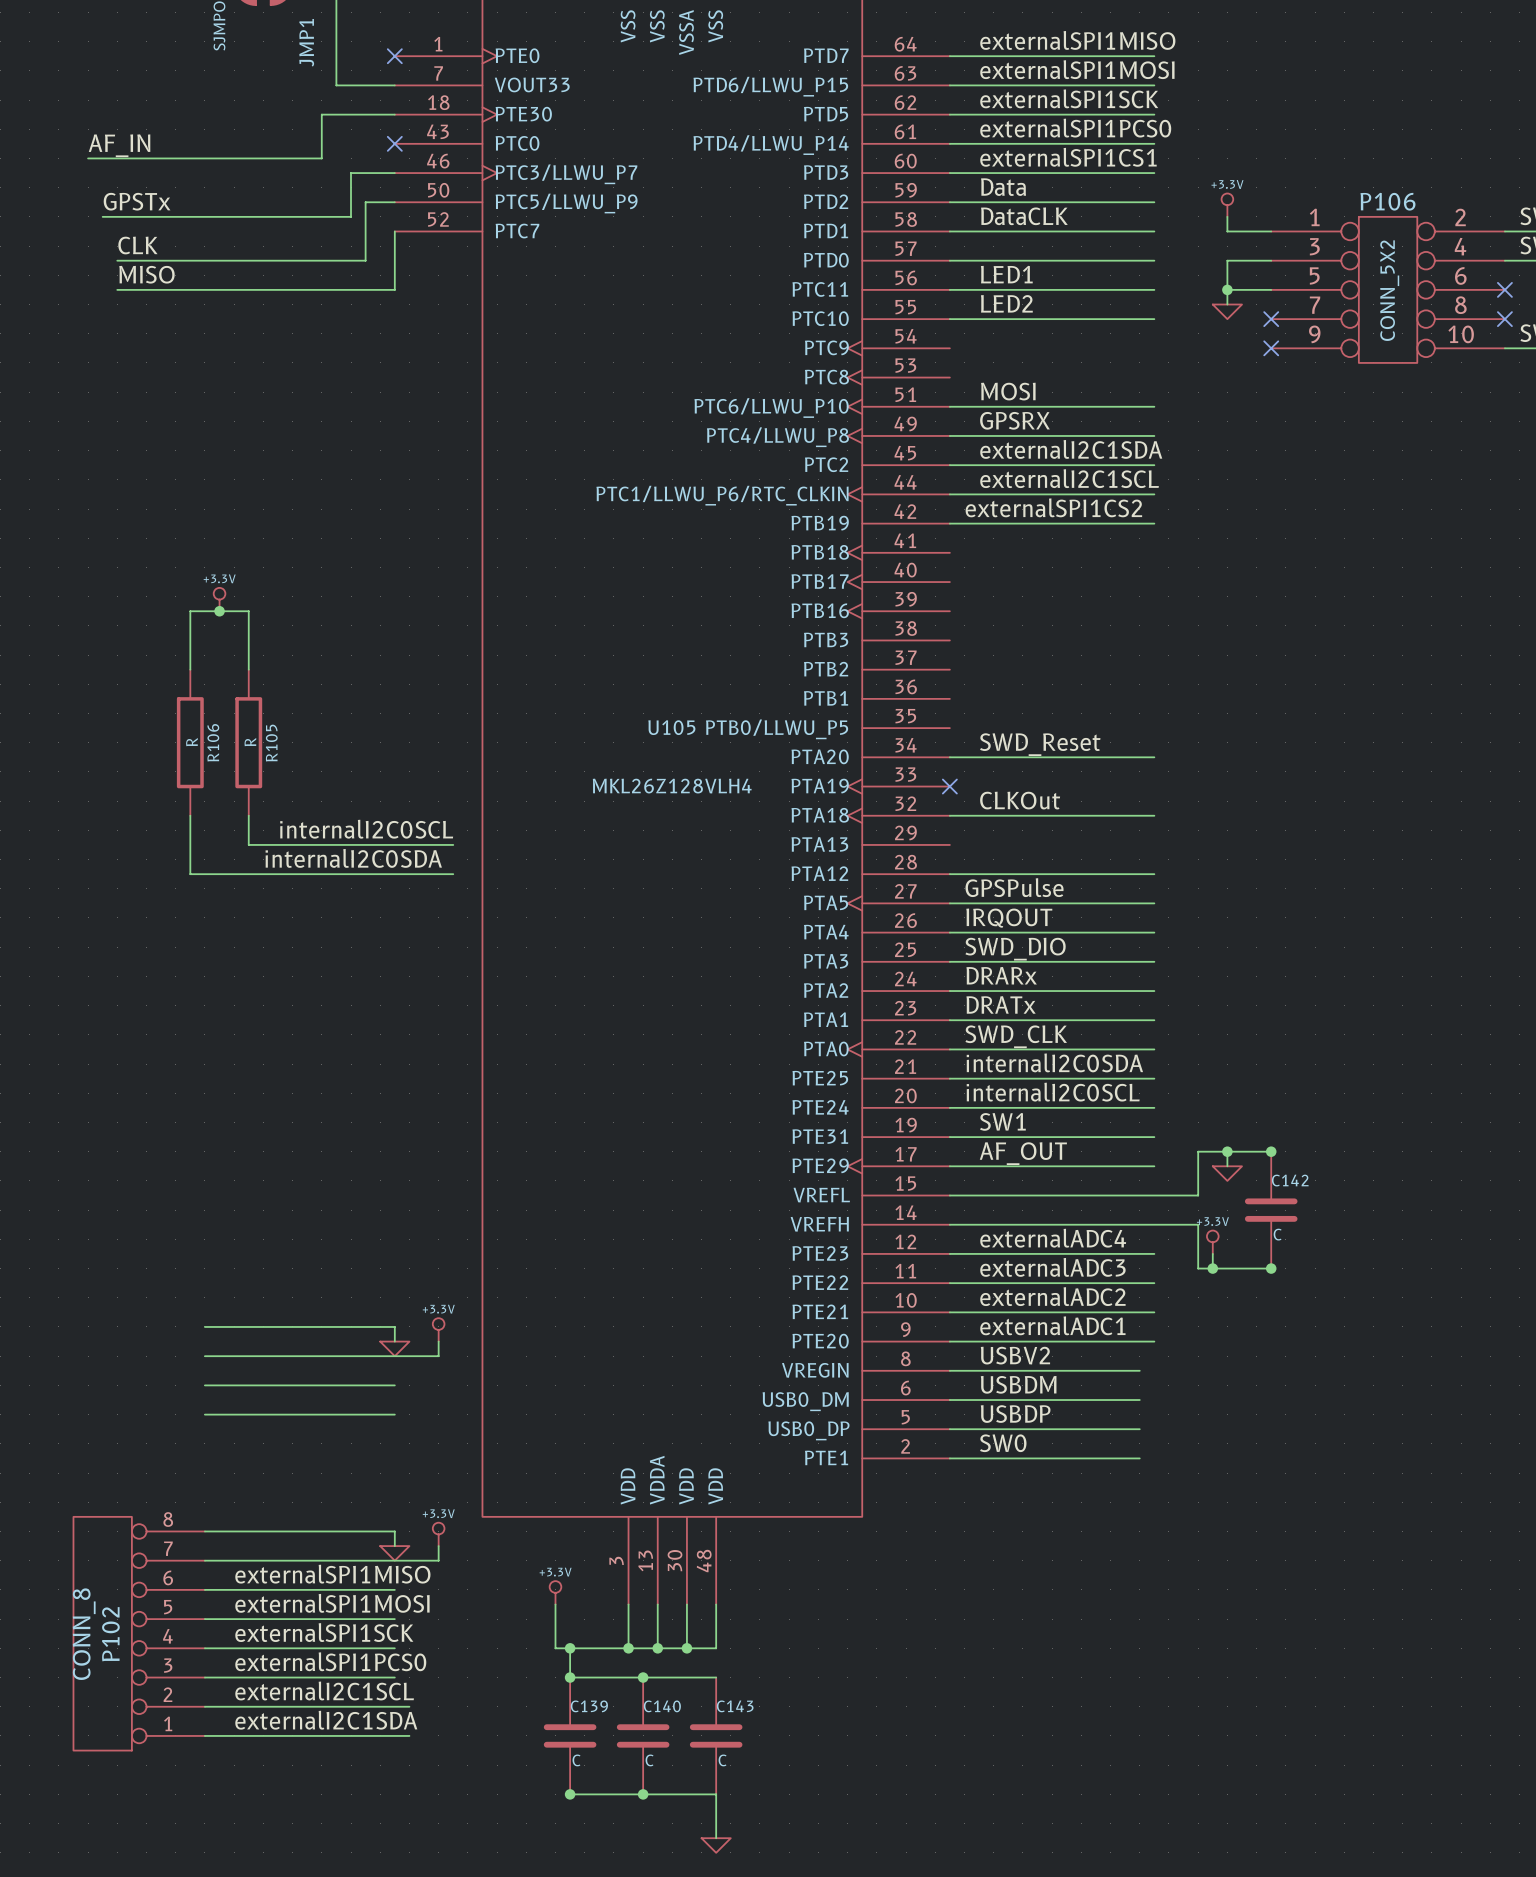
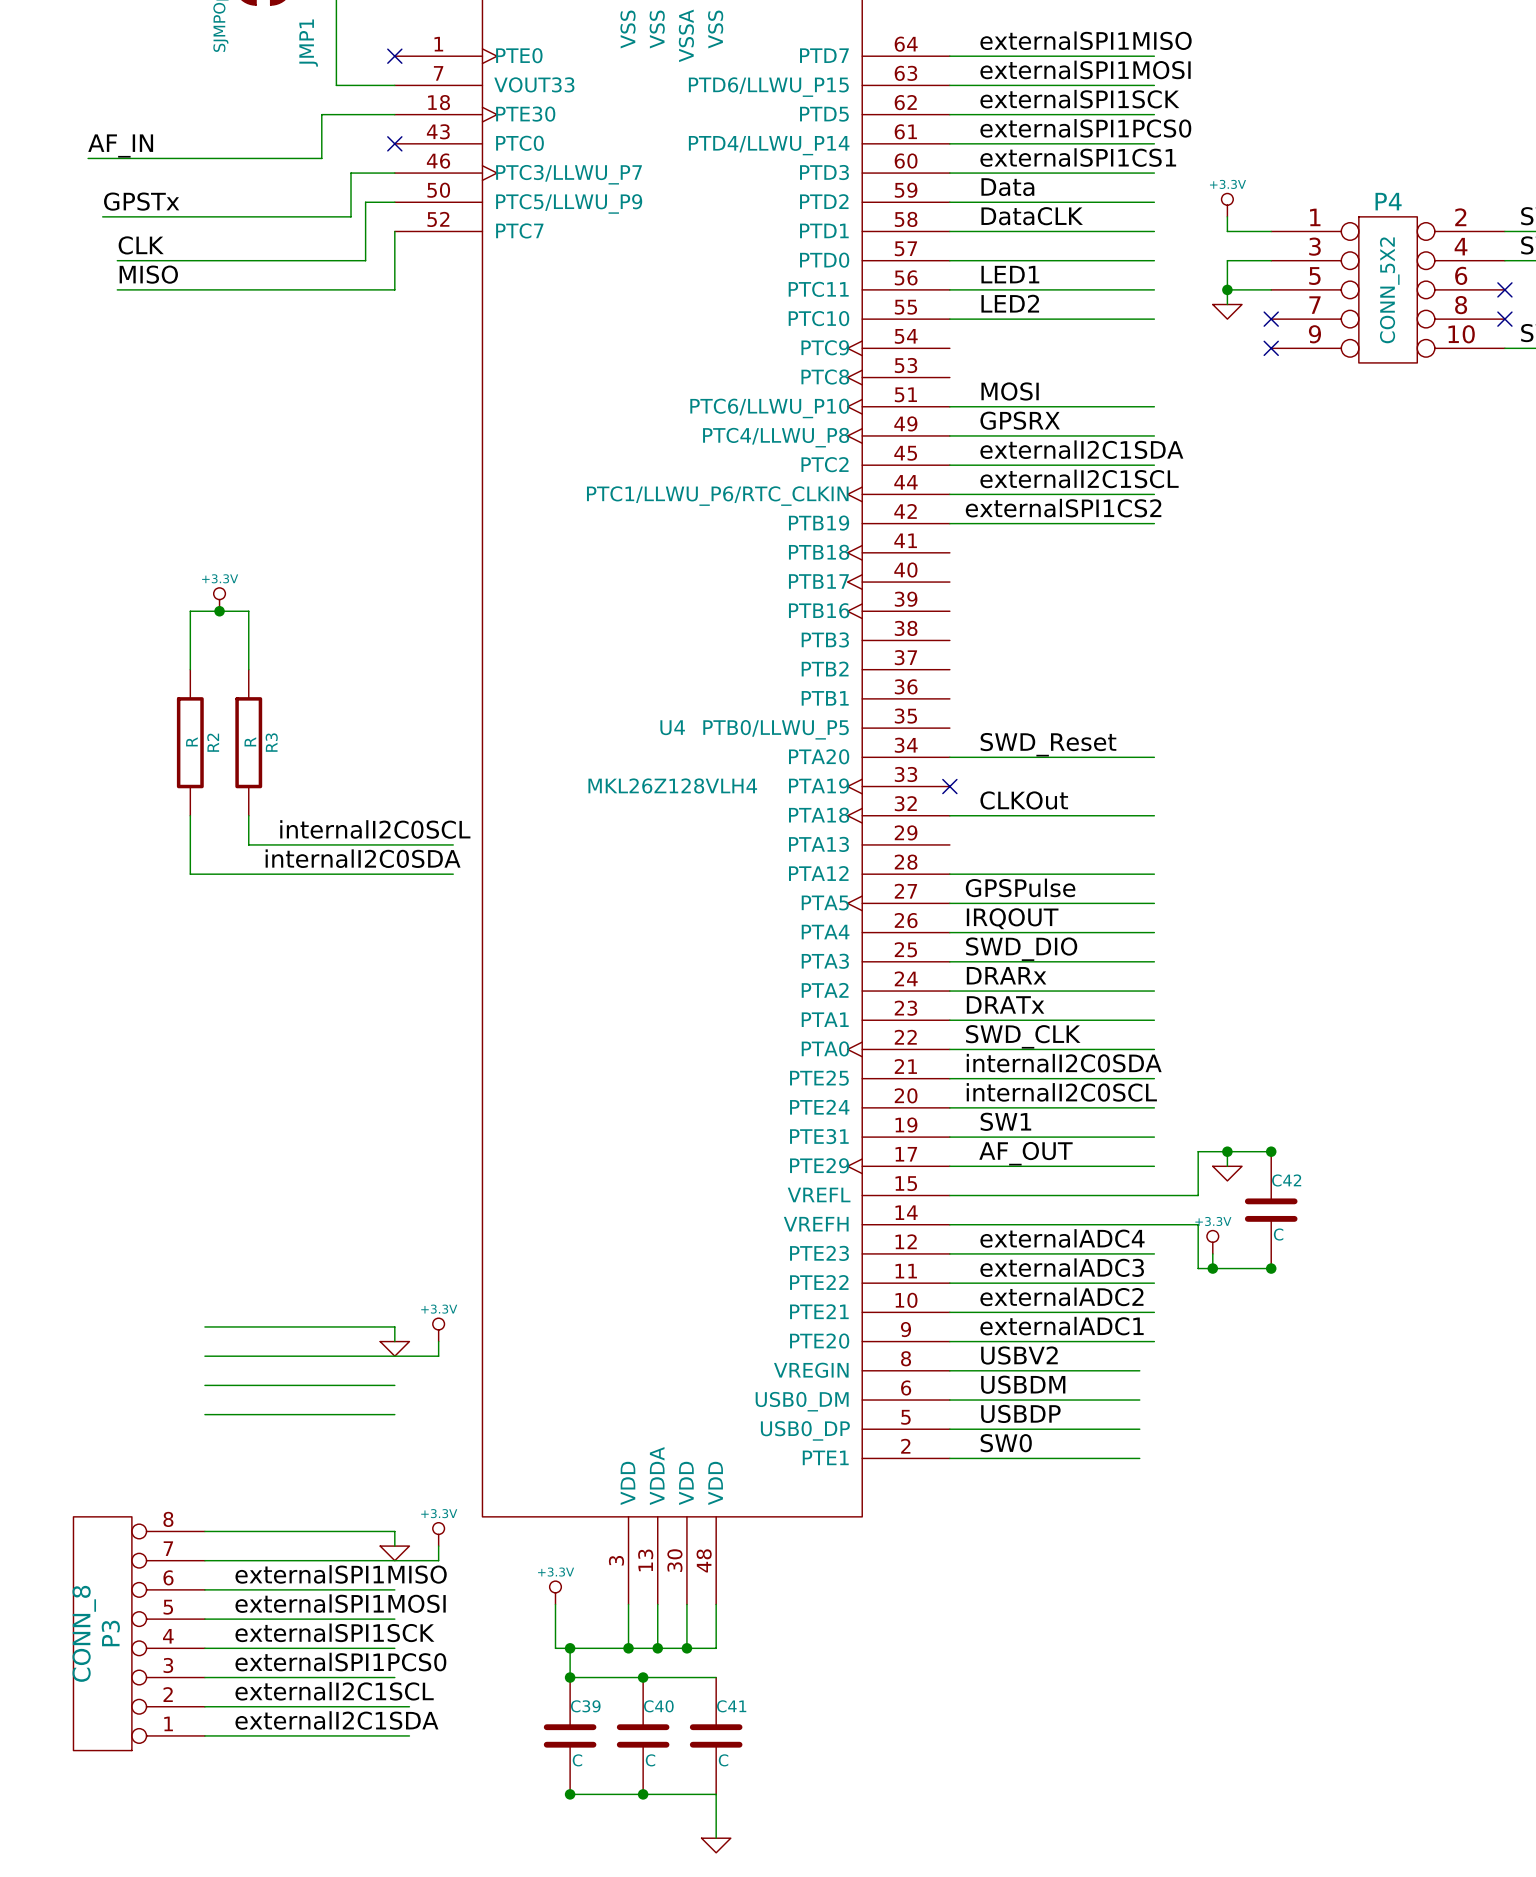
P106 name: P106 (1387, 201) -> P4 (1388, 201)
U105 name: U105 (671, 727) -> U4 (672, 727)
R106 name: R106 (213, 742) -> R2 (213, 742)
R105 name: R105 (271, 743) -> R3 (271, 742)
C142 name: C142 (1290, 1180) -> C42 (1286, 1180)
P102 name: P102 (110, 1634) -> P3 (110, 1633)
C139 name: C139 (589, 1706) -> C39 (585, 1706)
C140 name: C140 (662, 1706) -> C40 (658, 1706)
C143 name: C143 (735, 1706) -> C41 (731, 1706)

